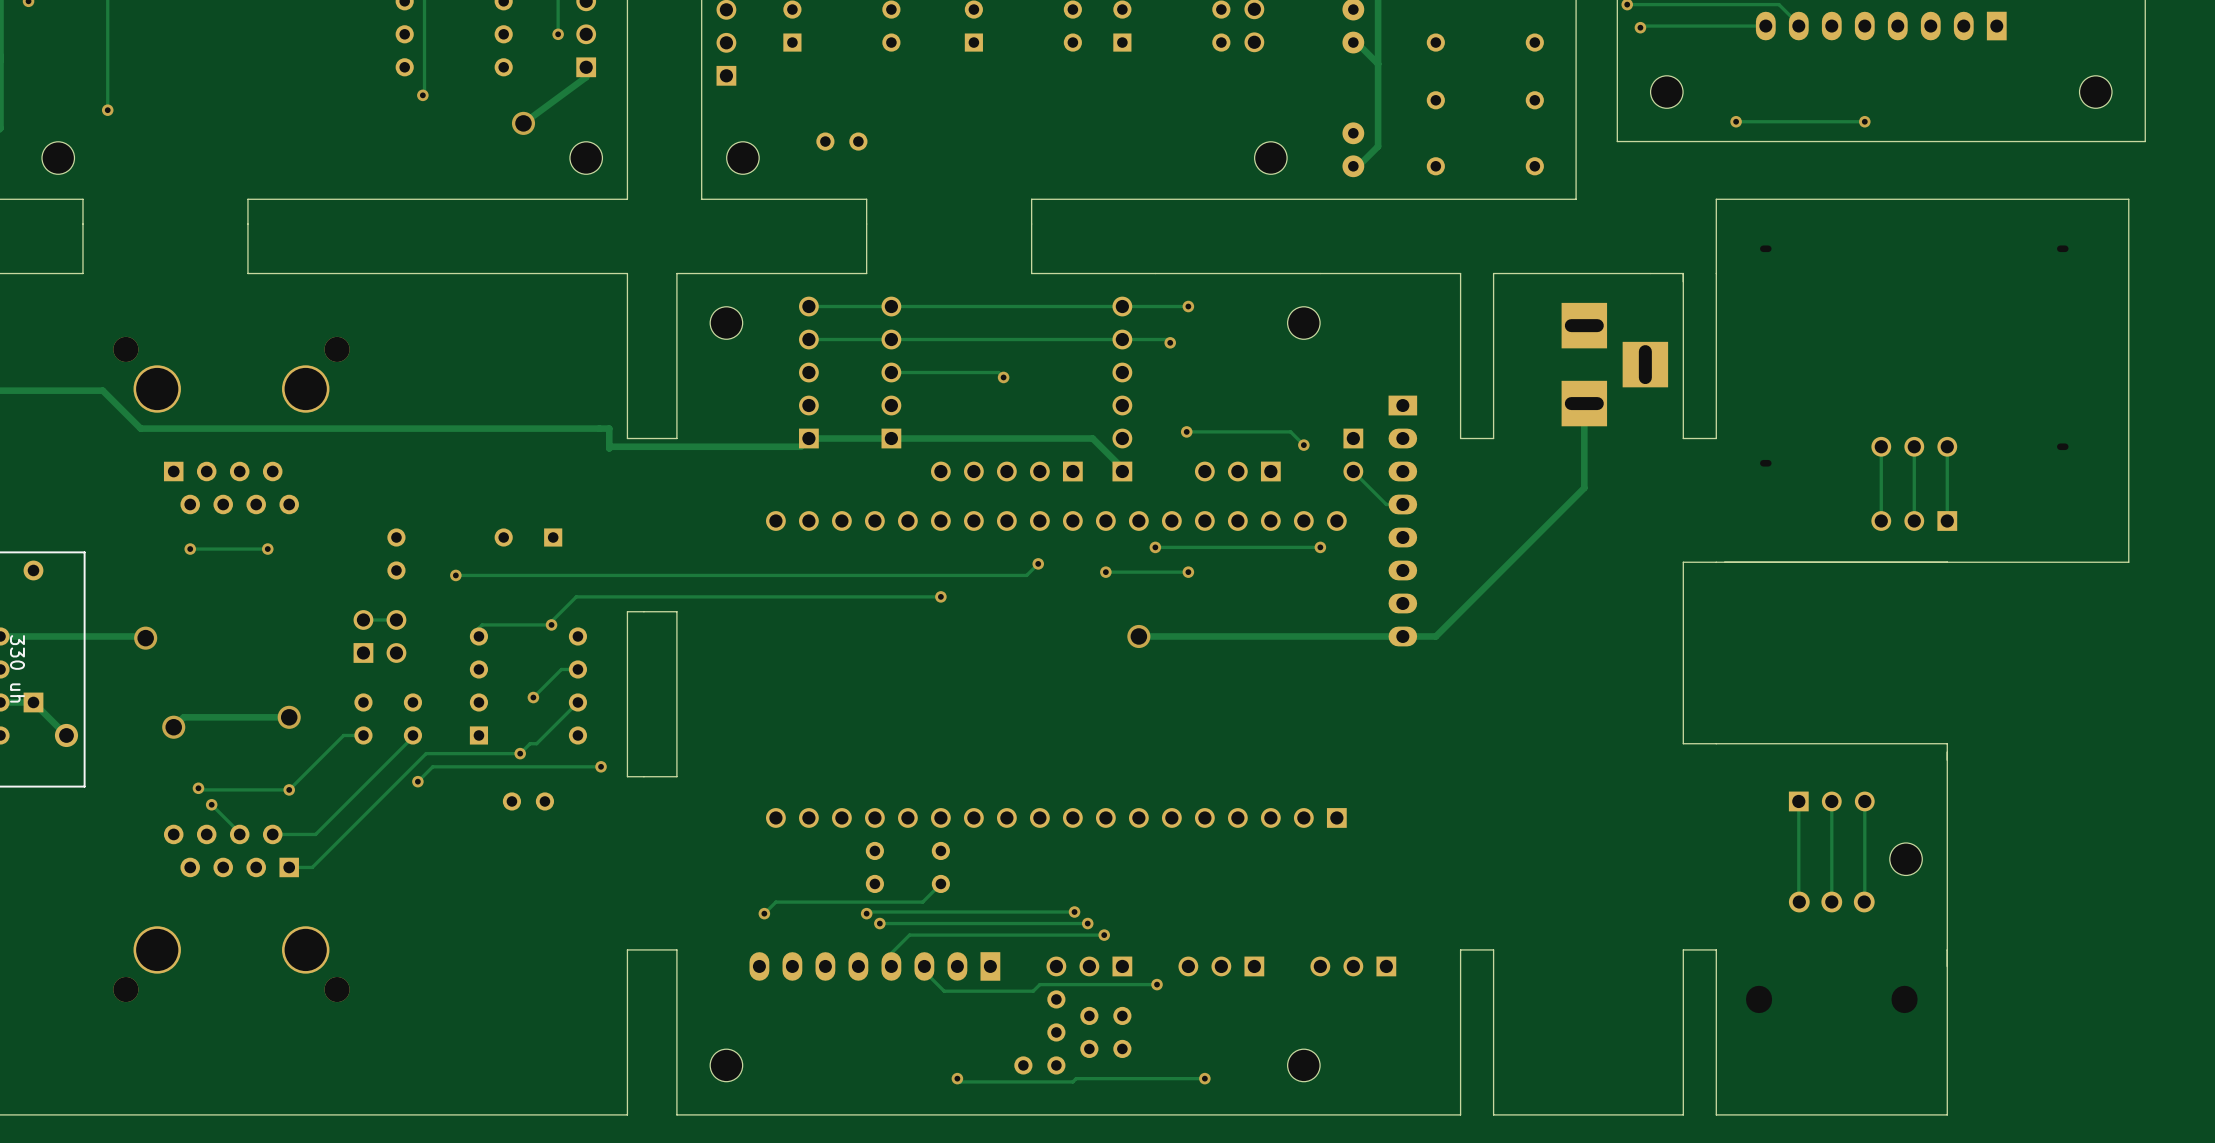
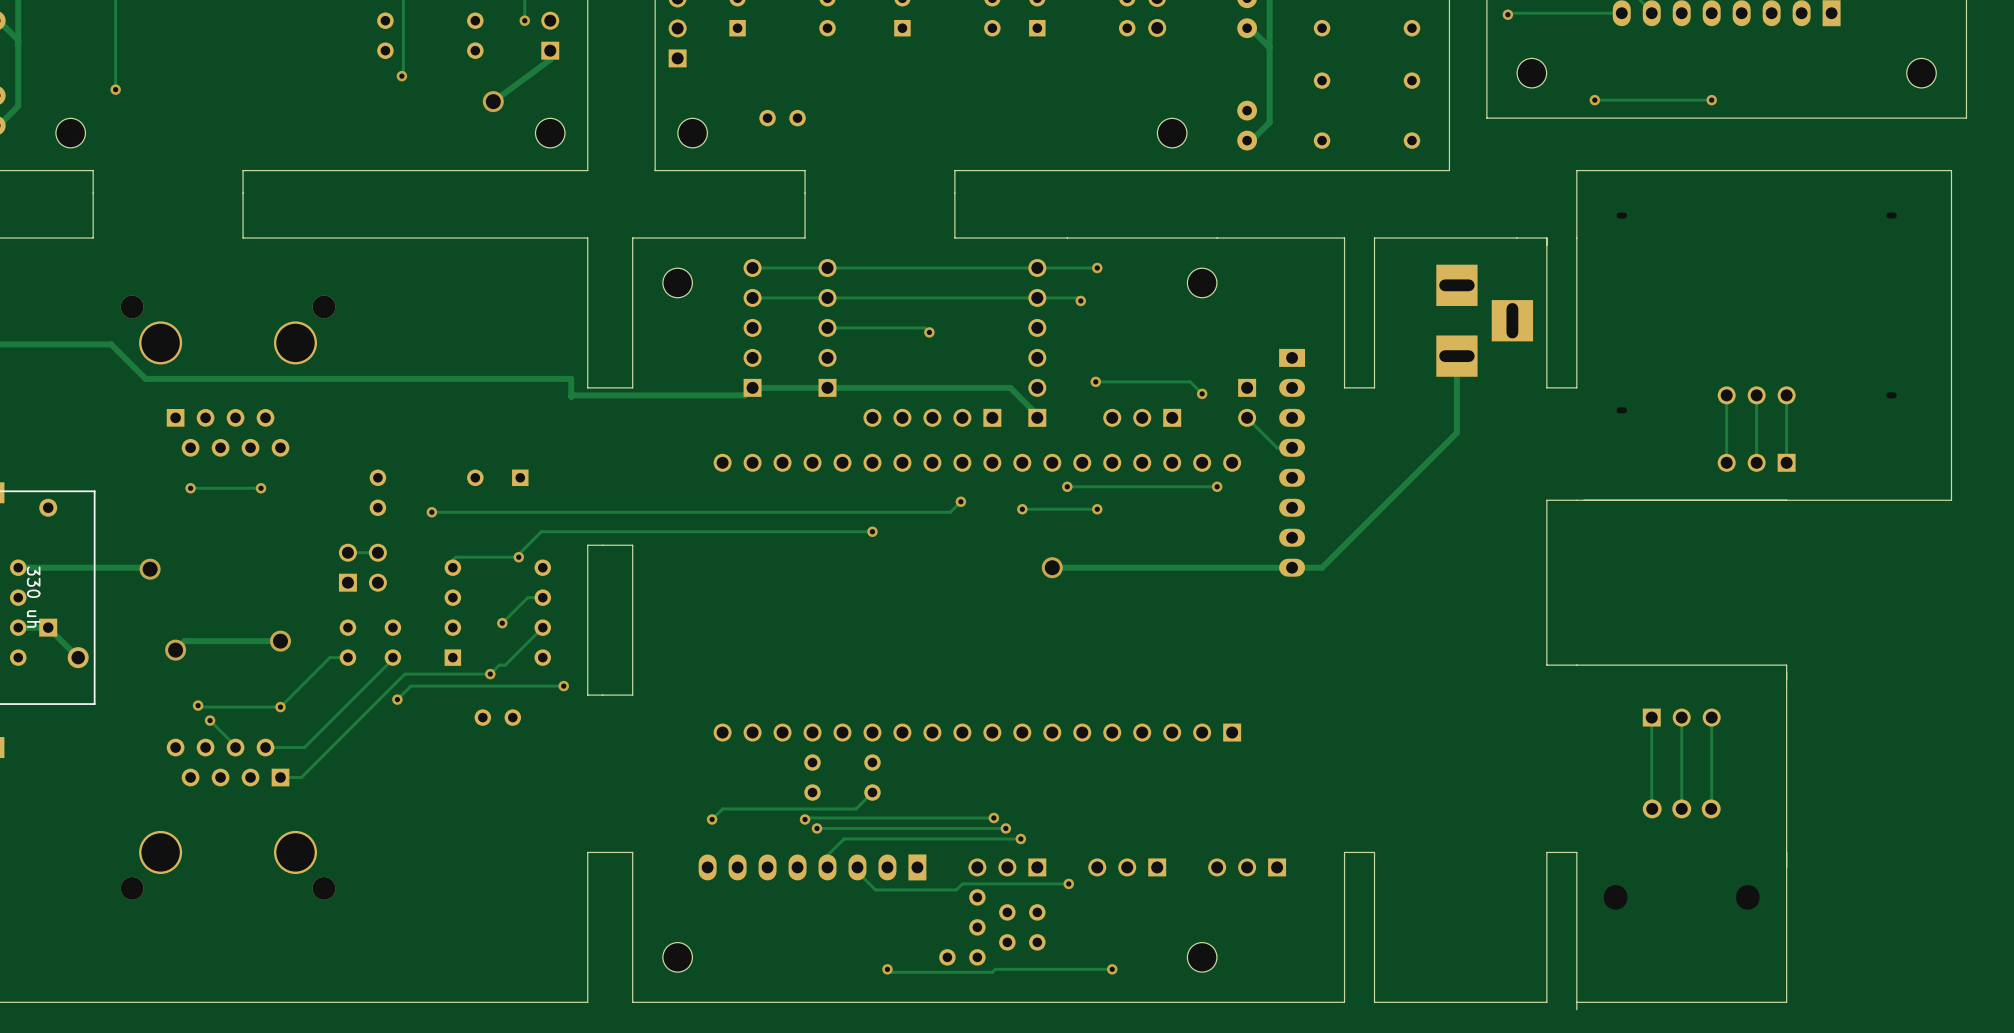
part: (1906, 859) -> none
board edge: none -> (1576, 1002) (1576, 1009)

